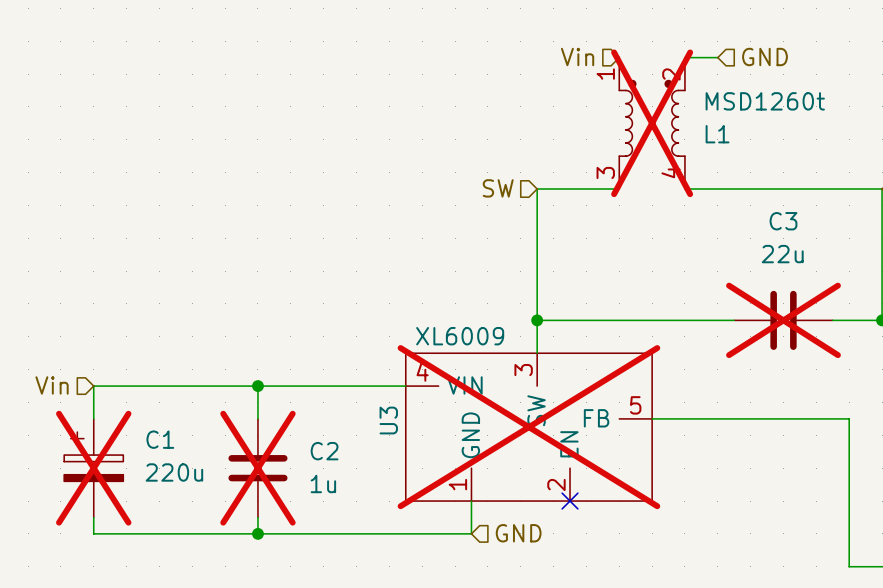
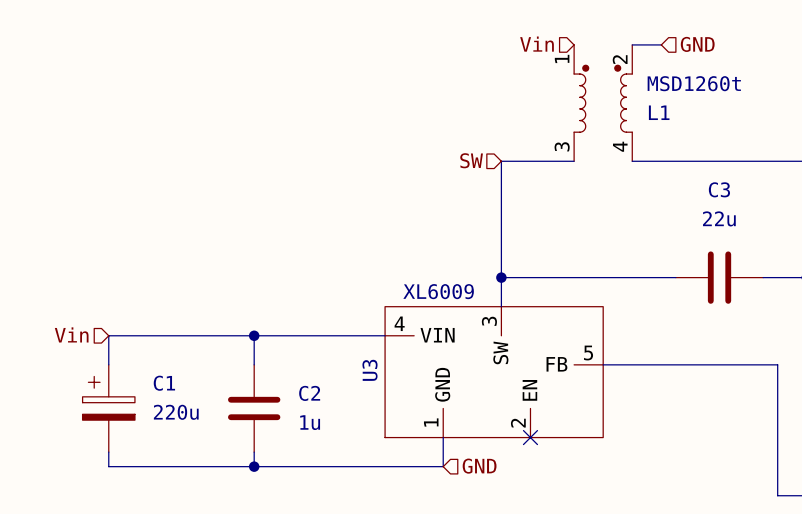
L1 do-not-place cross: (652, 123) -> none
C3 do-not-place cross: (783, 320) -> none
U3 do-not-place cross: (528, 427) -> none
C1 do-not-place cross: (93, 468) -> none
C2 do-not-place cross: (257, 468) -> none

